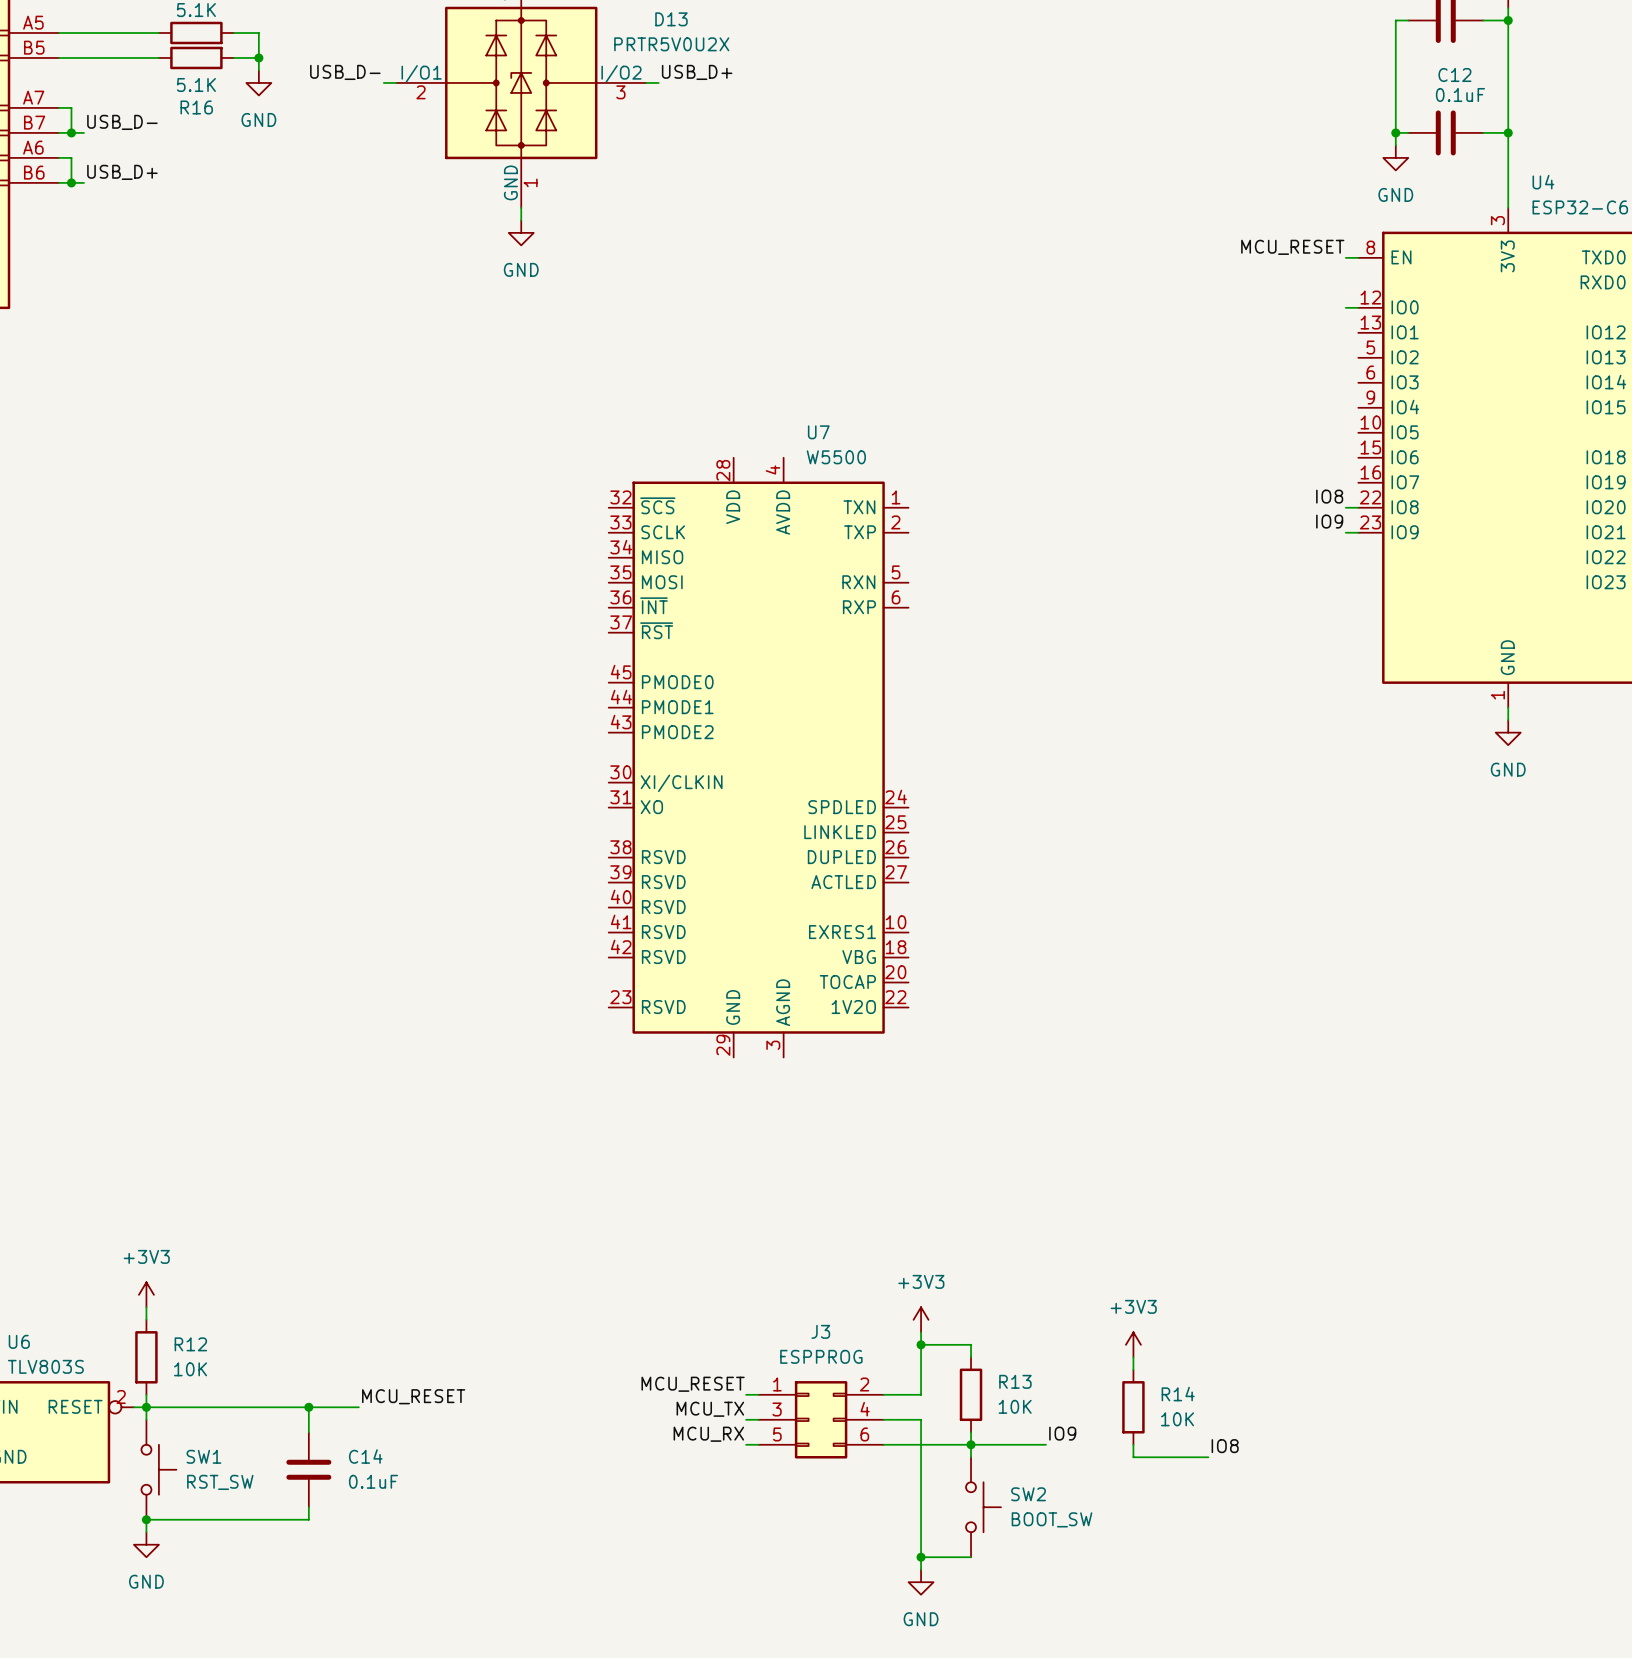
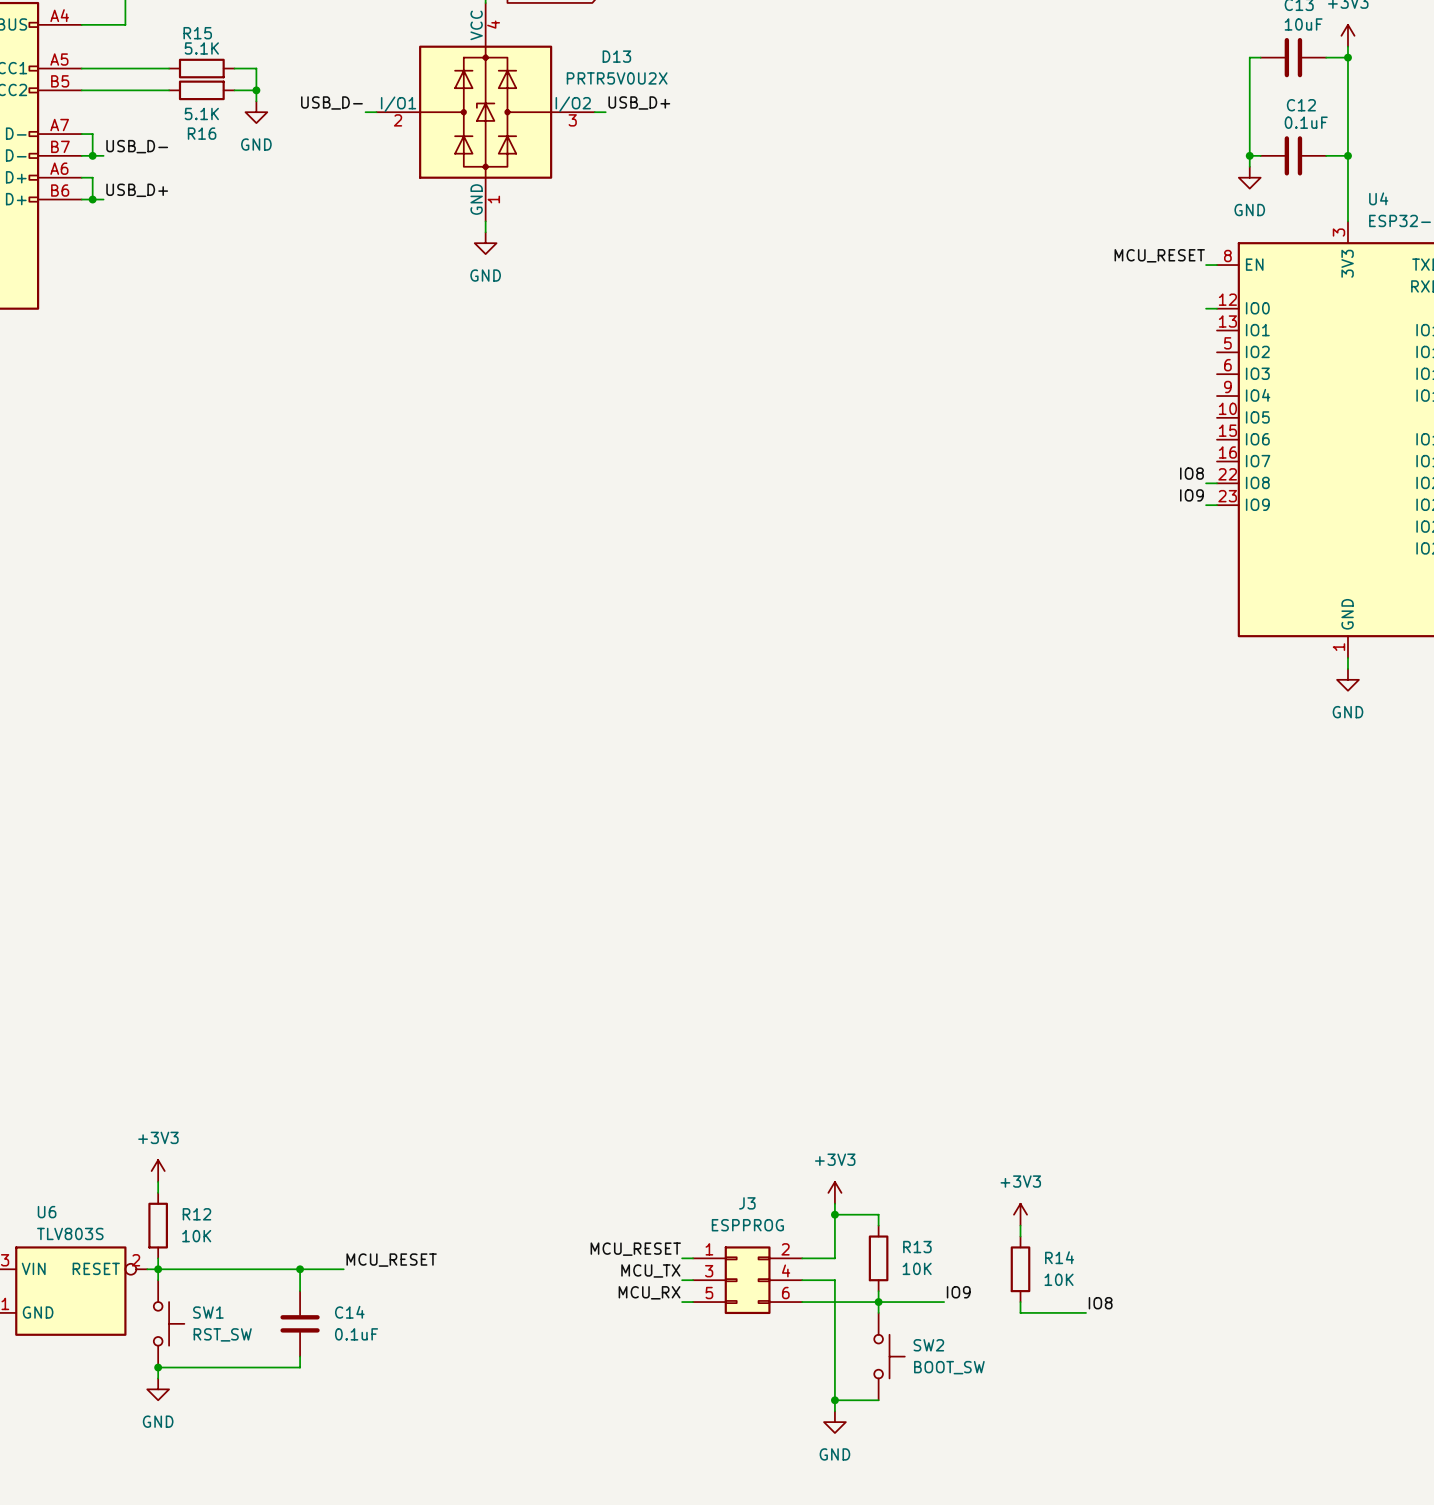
U7: W5500 (758, 757) -> none

